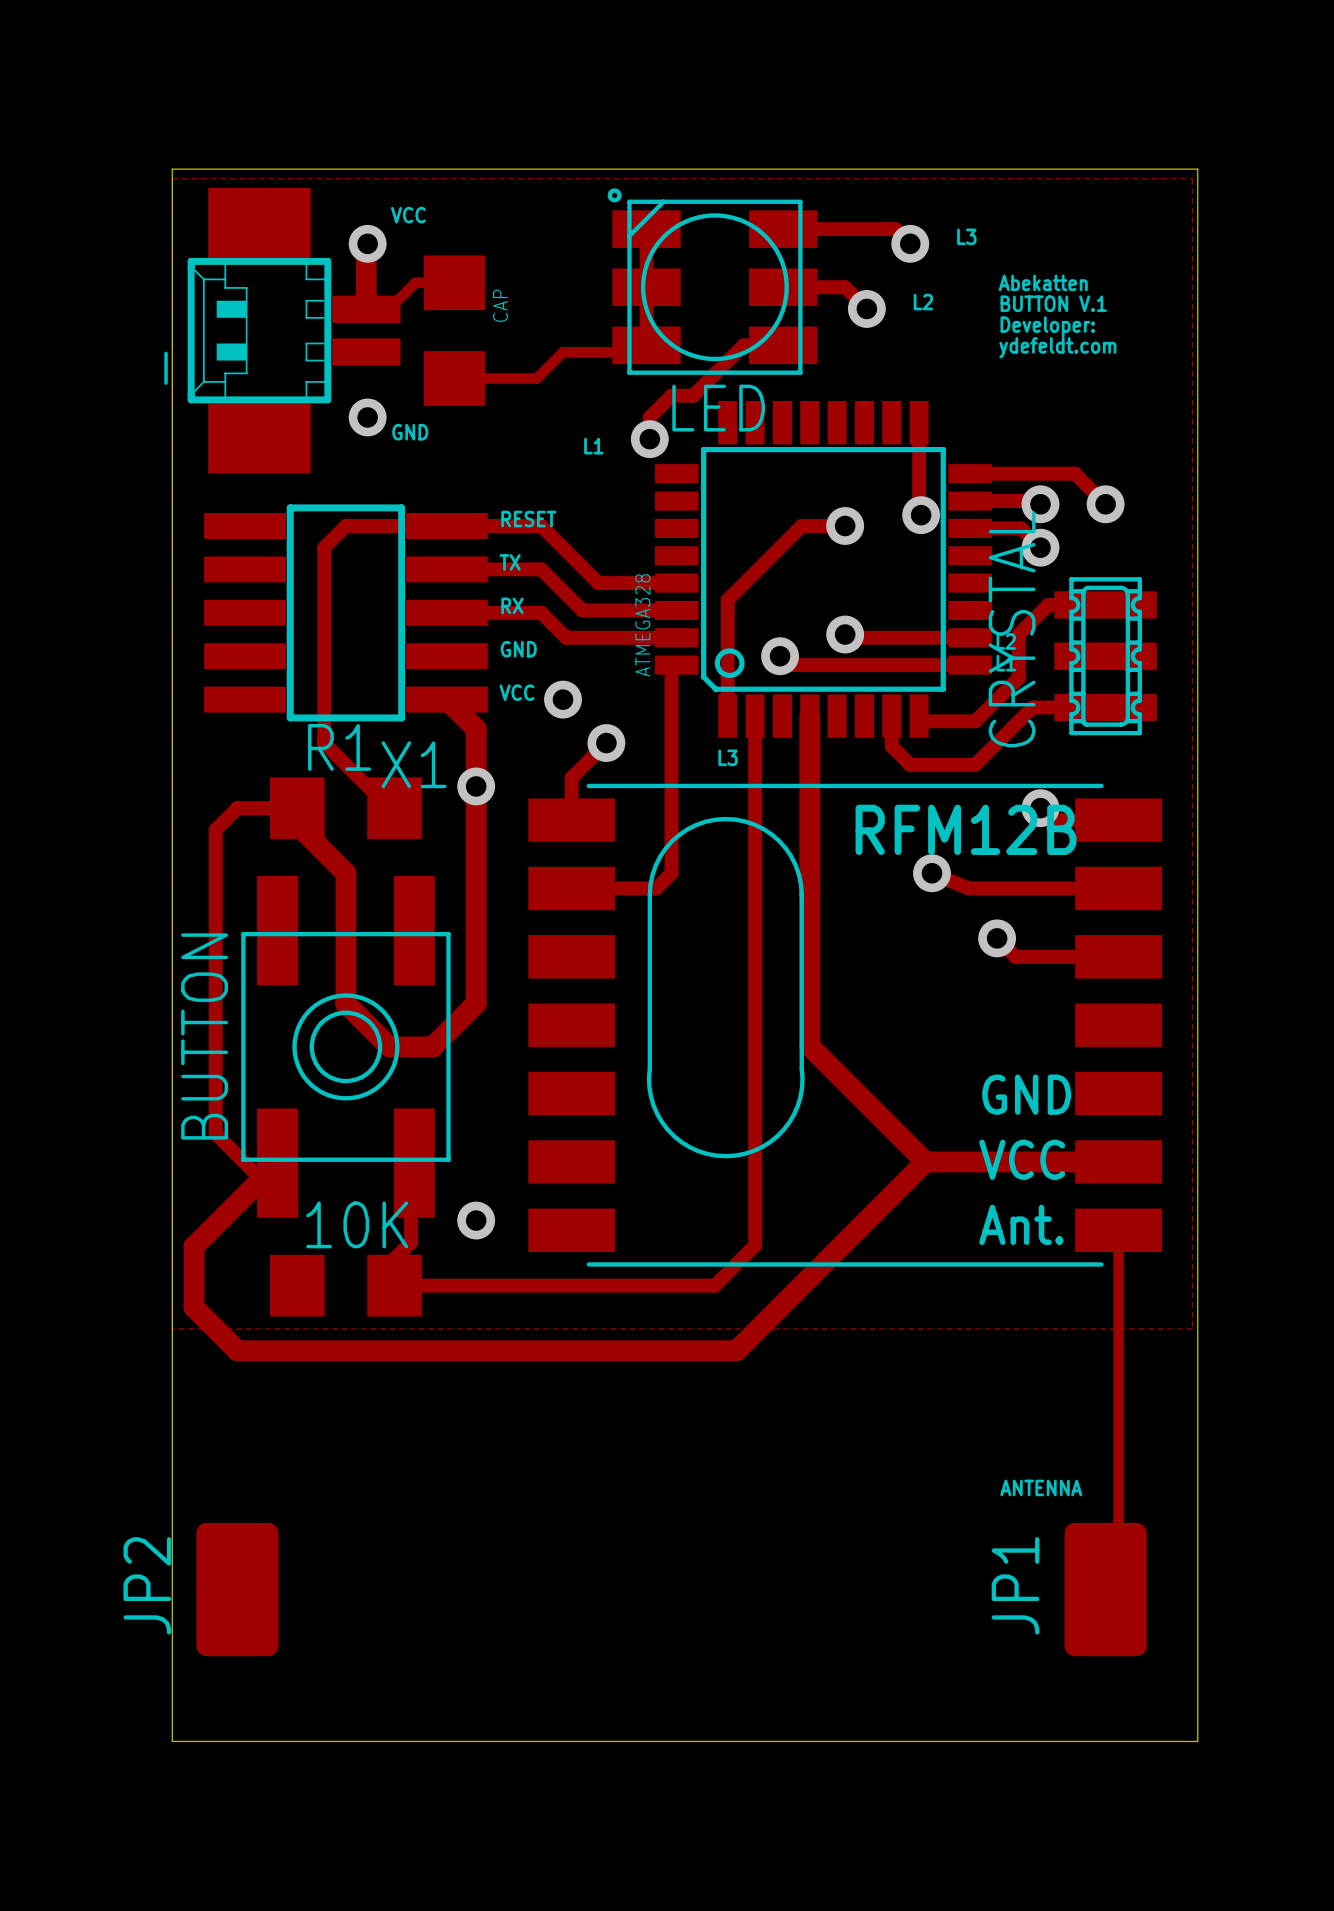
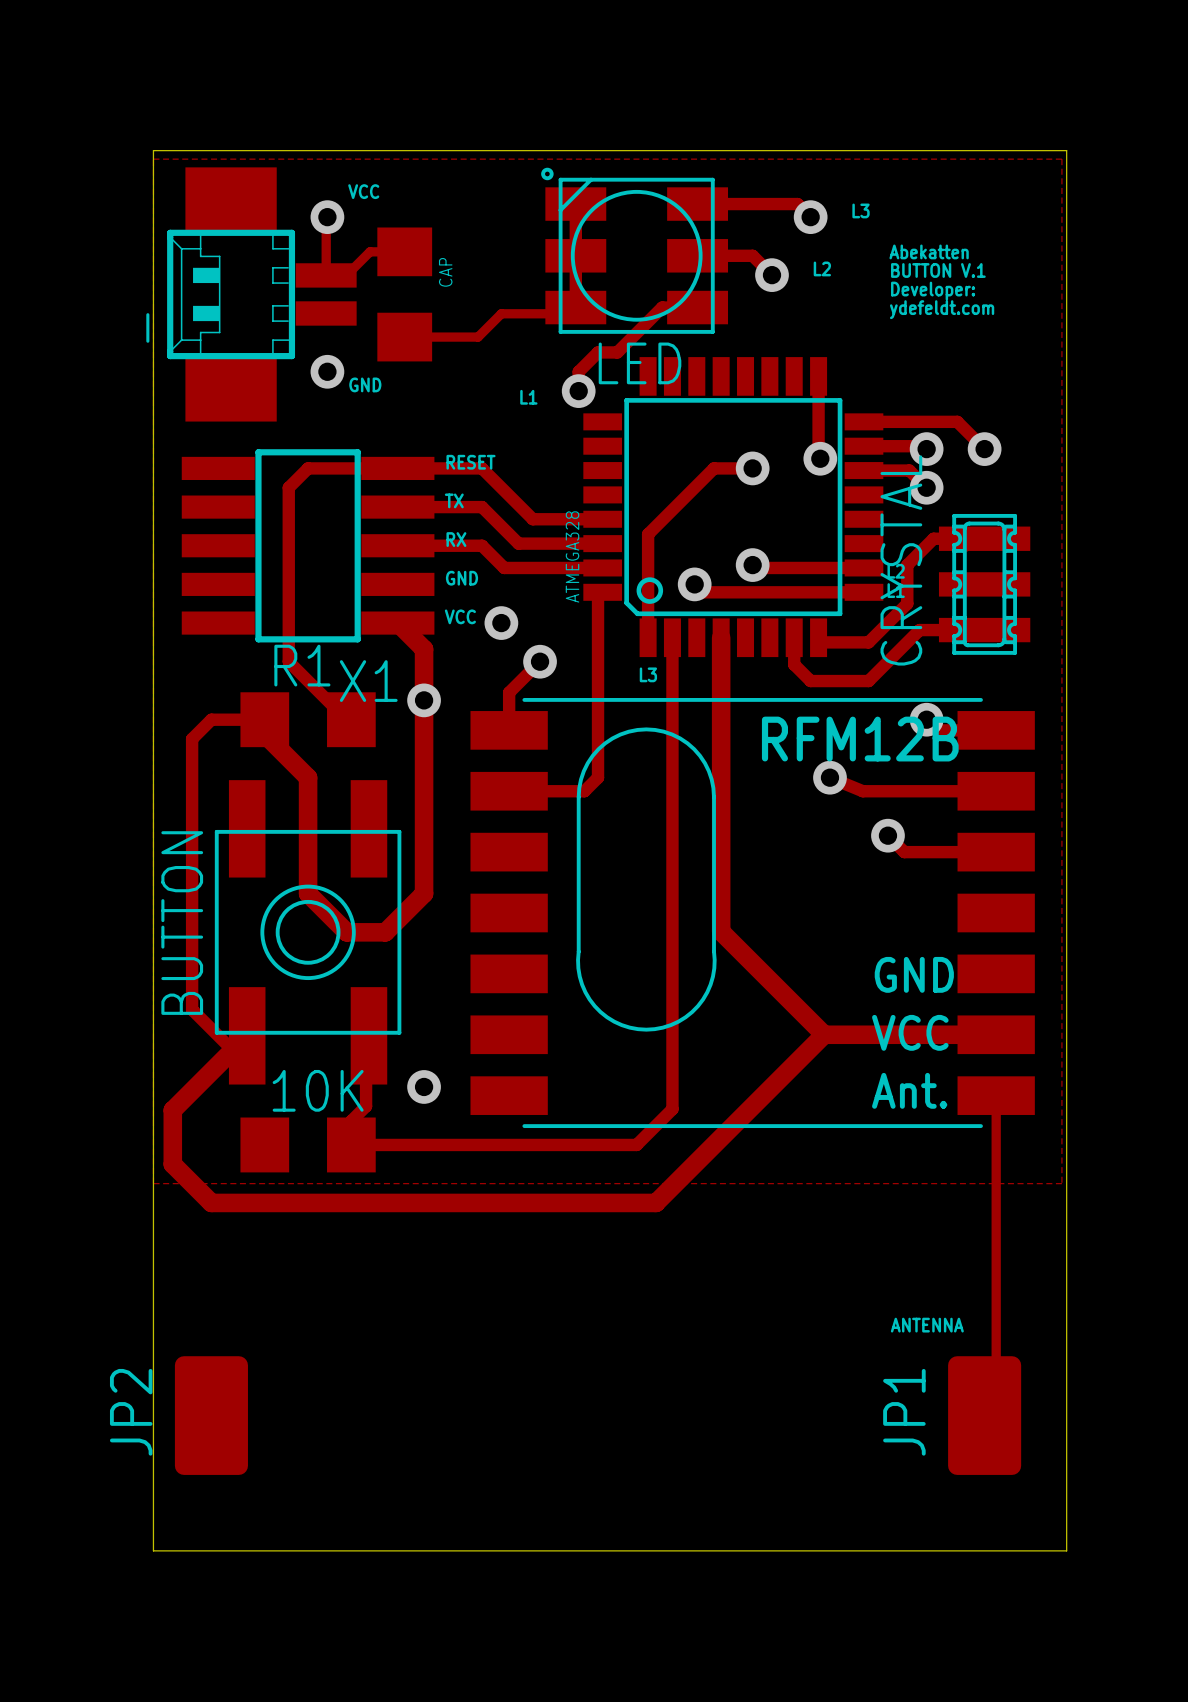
track width: thick (366, 245) (366, 309) -> thin (326, 218) (326, 275)

